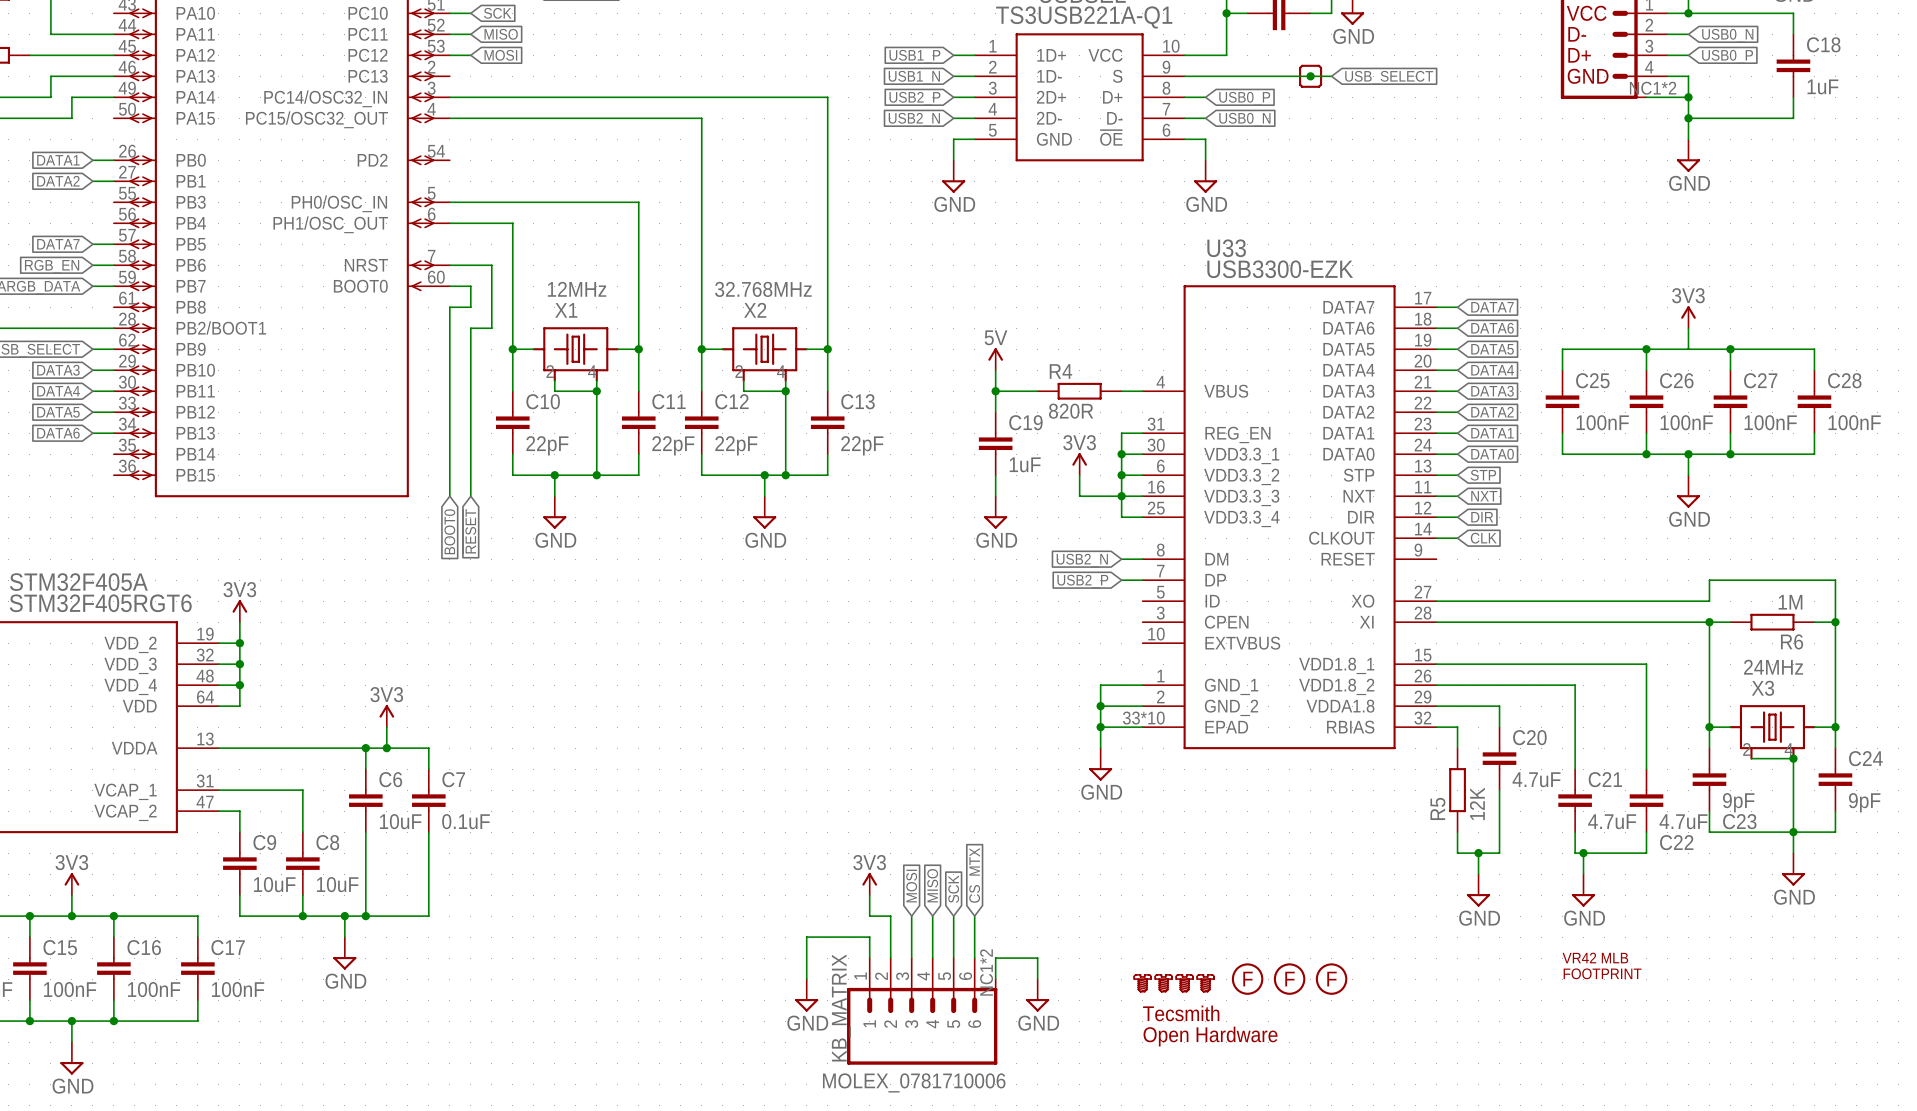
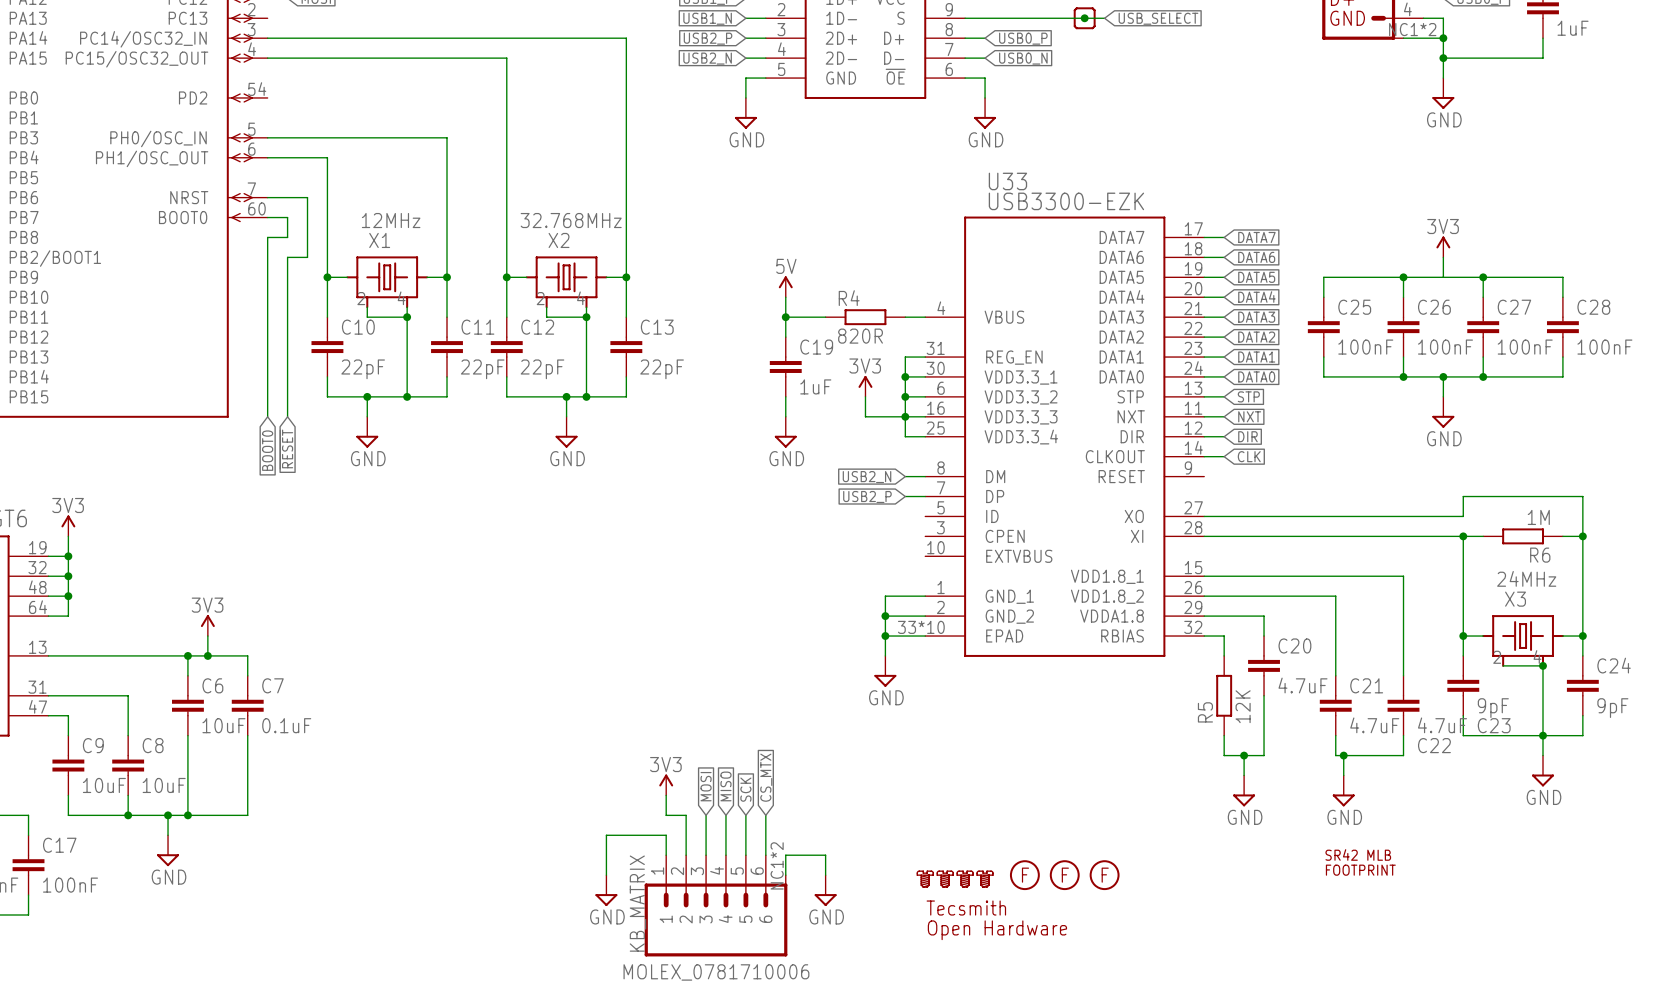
part text: VR42 MLB (1595, 958) -> SR42 MLB (1358, 854)

